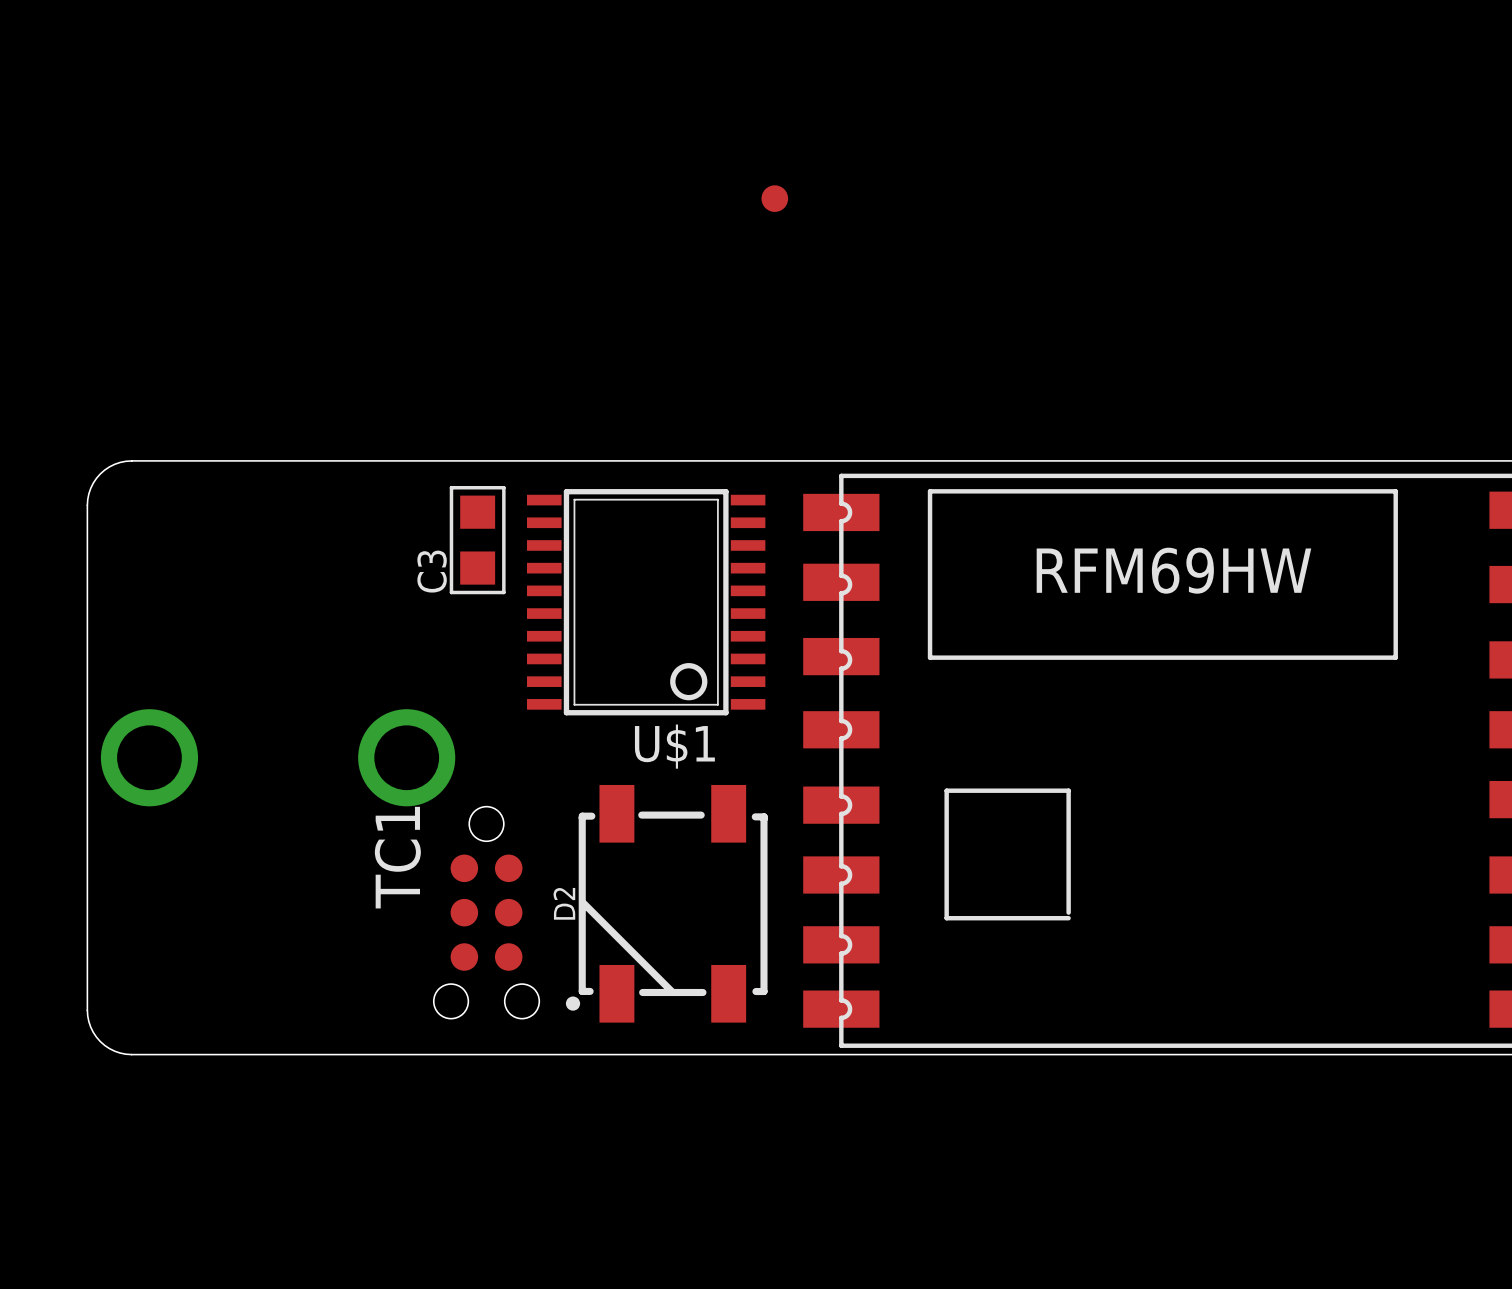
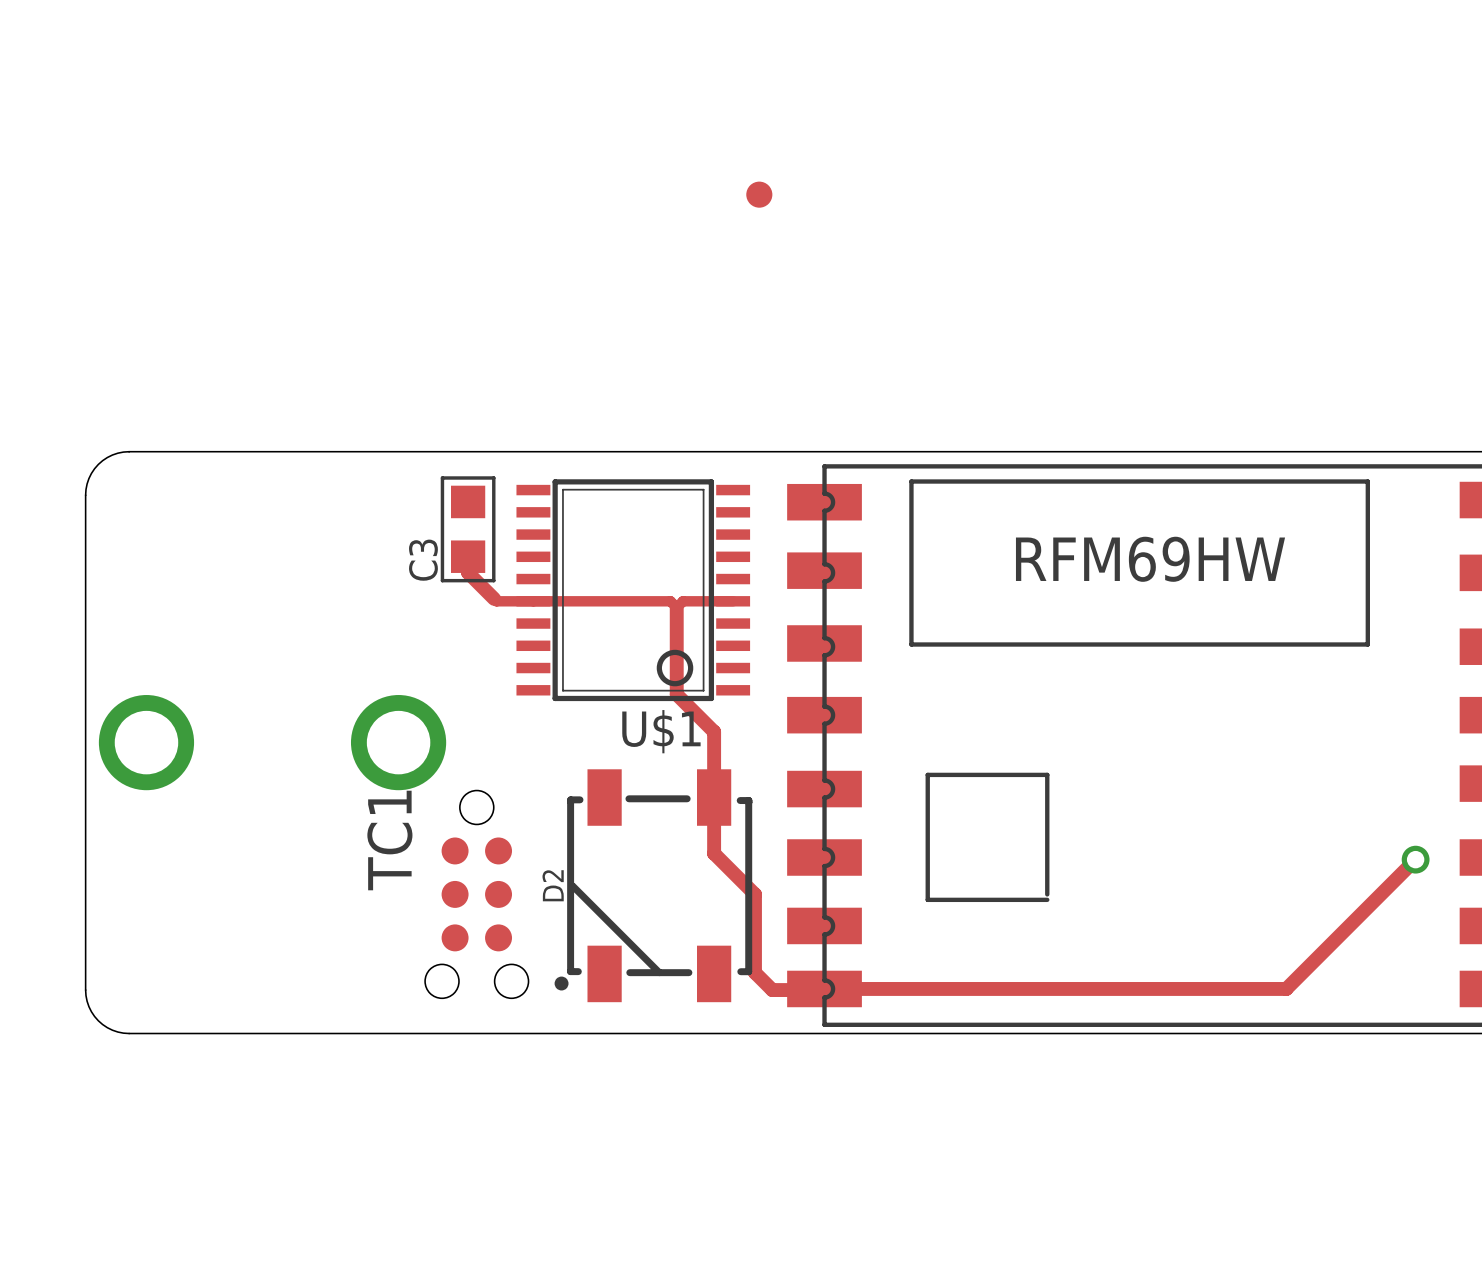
track: none -> (468, 556) (468, 572) (496, 601) (670, 601) (676, 607)
track: none -> (733, 601) (683, 601) (676, 607)
track: none -> (676, 607) (676, 694) (714, 731) (714, 853) (754, 894) (754, 972) (772, 990) (1286, 988) (1415, 859)
via: none -> (1415, 859)

